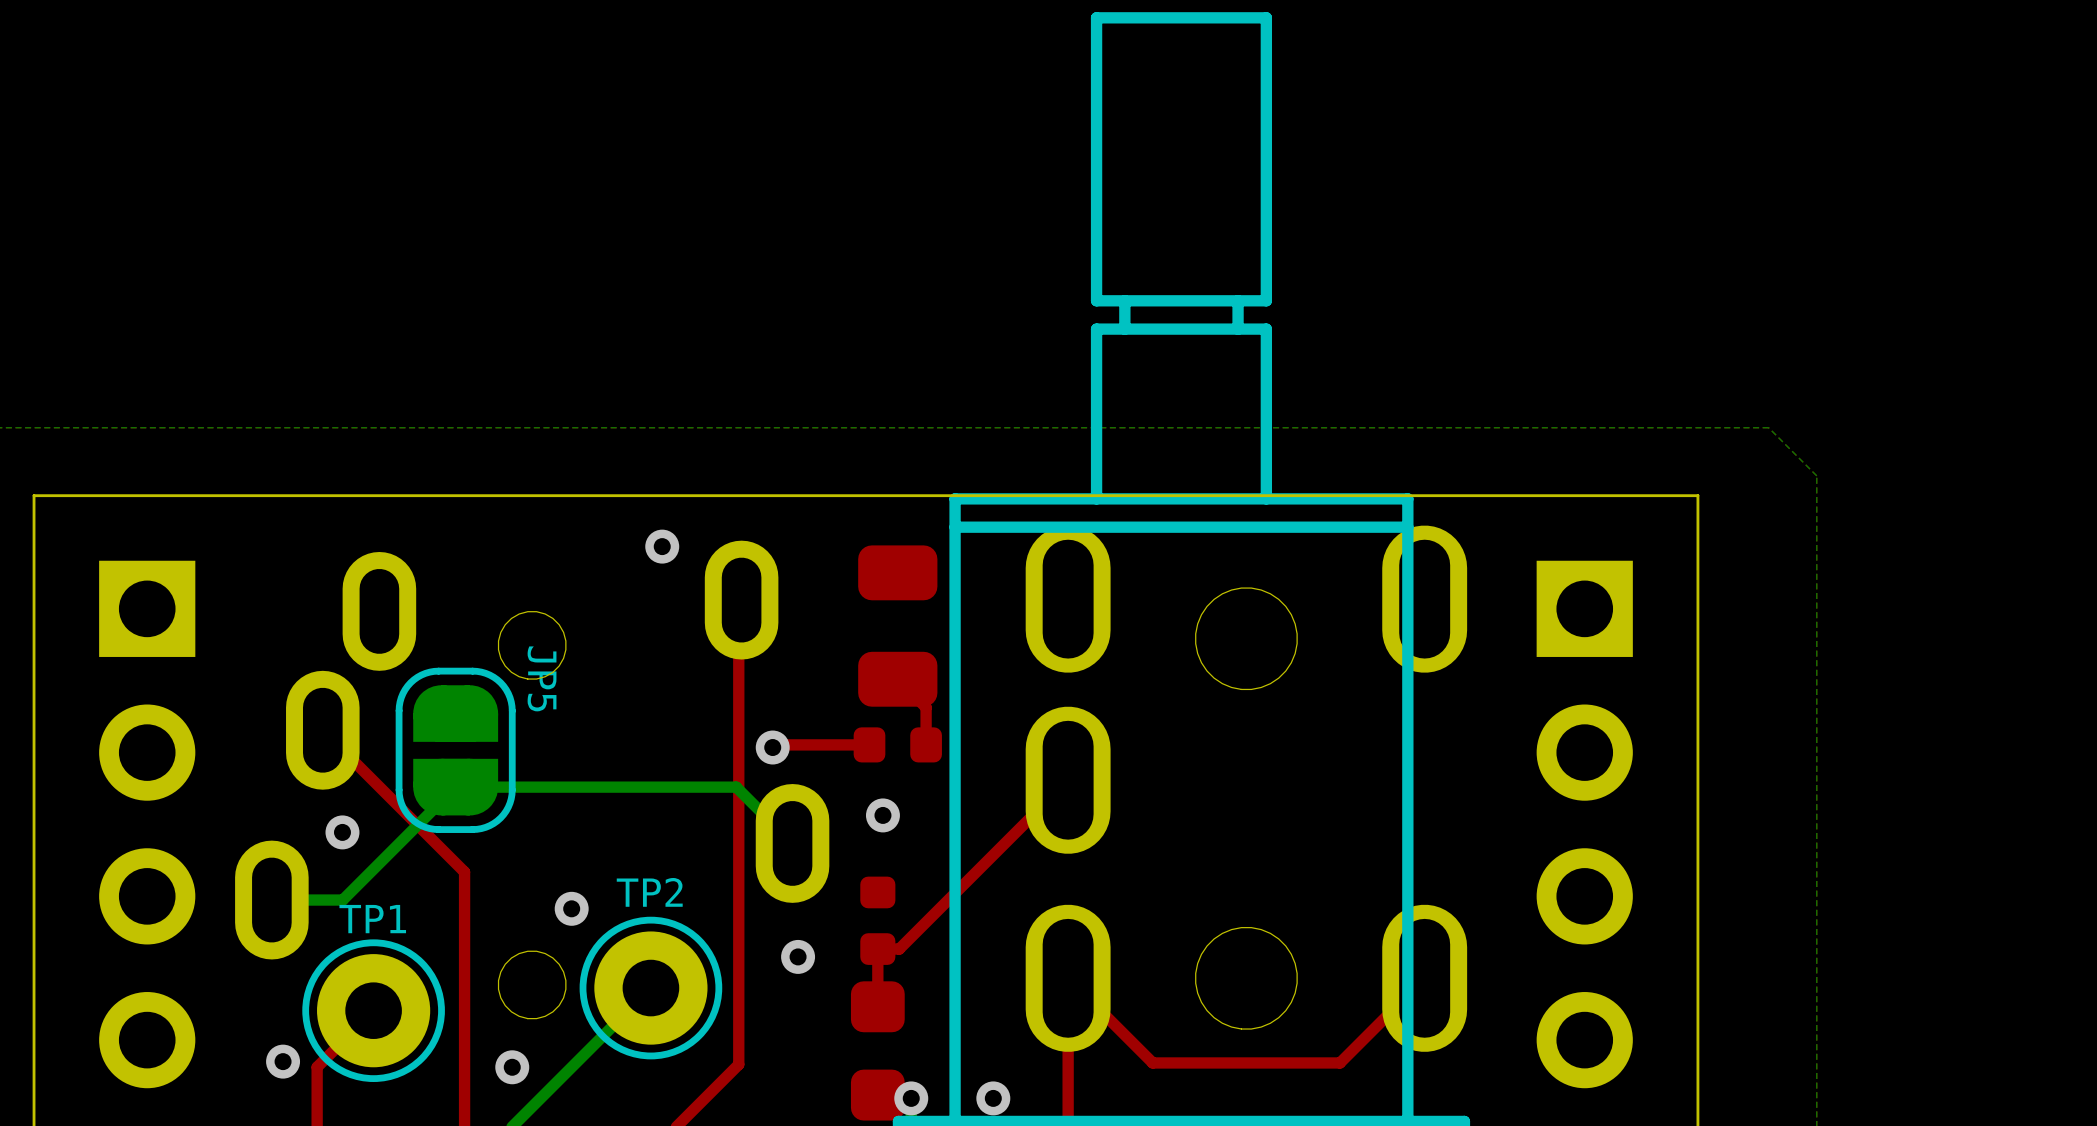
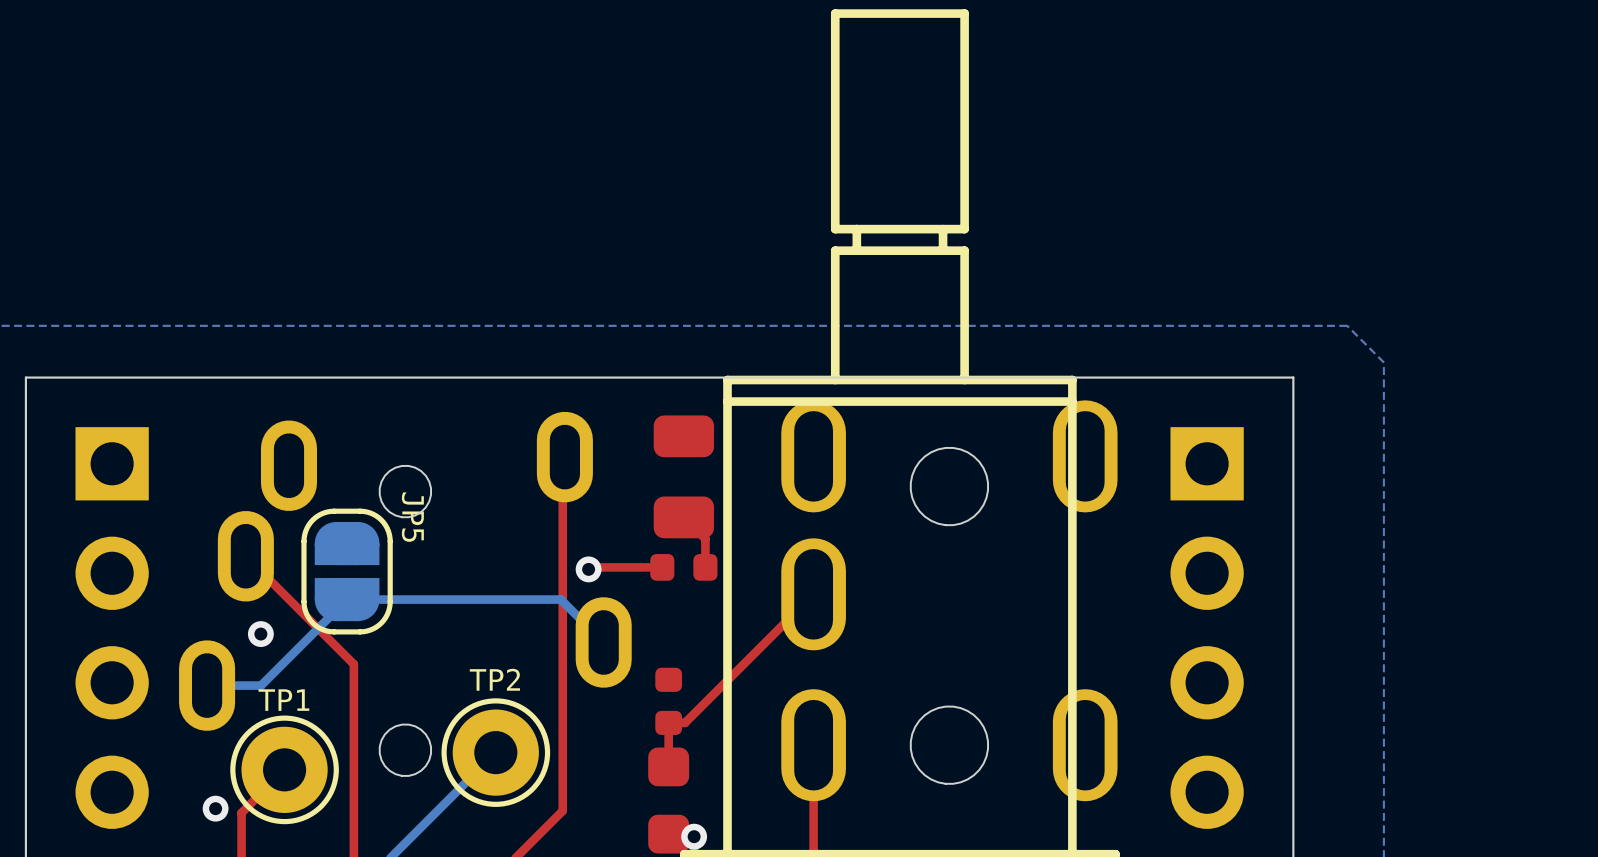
via: (662, 546) -> none
via: (882, 815) -> none
via: (571, 908) -> none
via: (798, 956) -> none
top track: (1424, 978) (1340, 1062) (1152, 1062) (1068, 978) -> none
via: (512, 1067) -> none
via: (993, 1098) -> none

